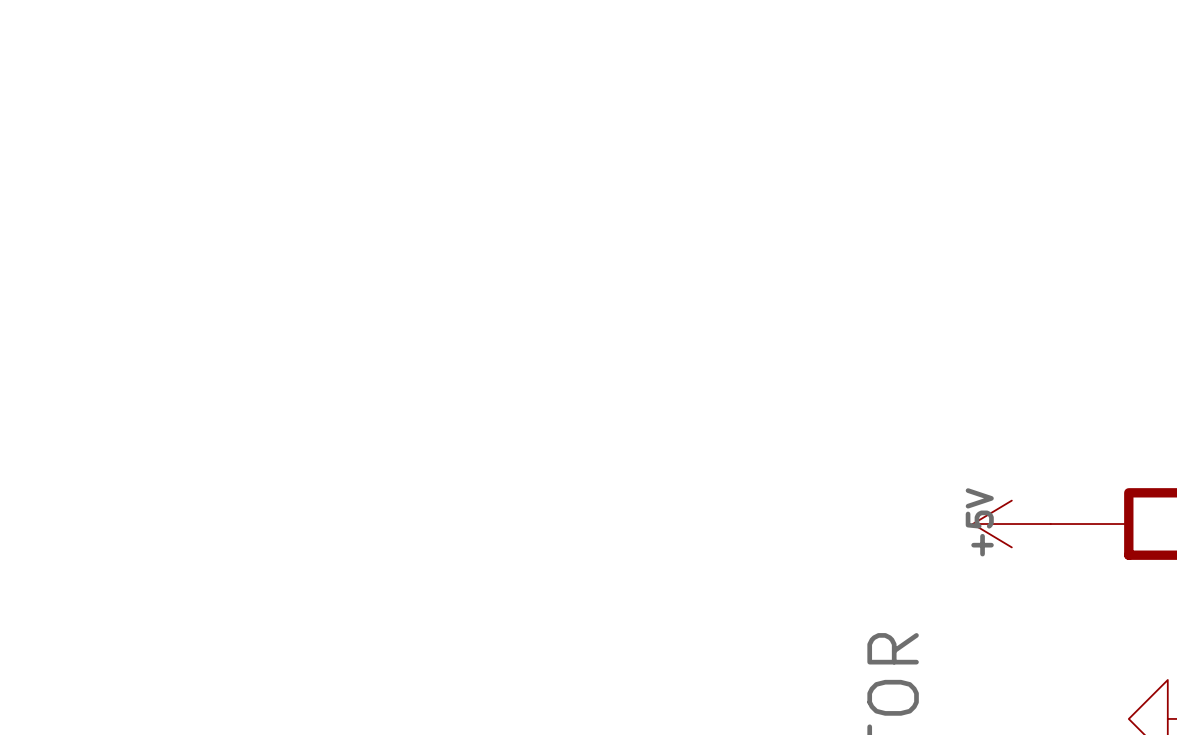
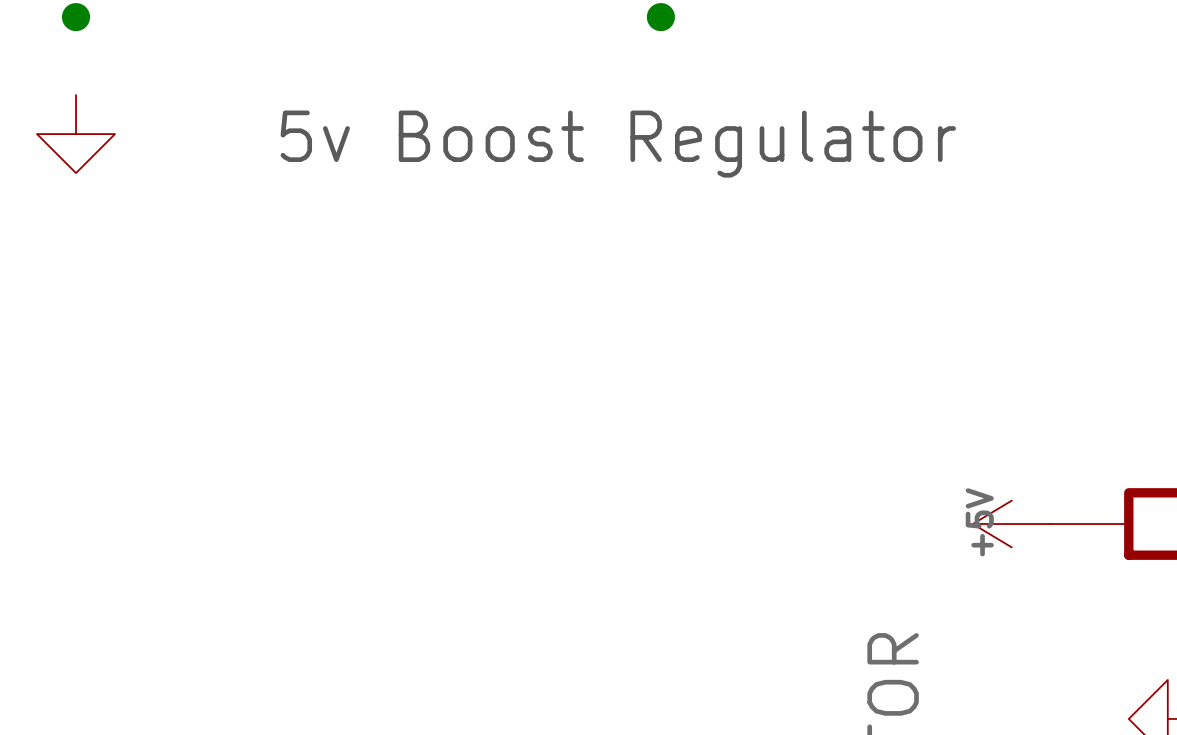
junction: none -> (76, 17)
junction: none -> (660, 17)
power symbol: none -> (76, 134)
text: none -> 5v Boost Regulator (618, 144)

